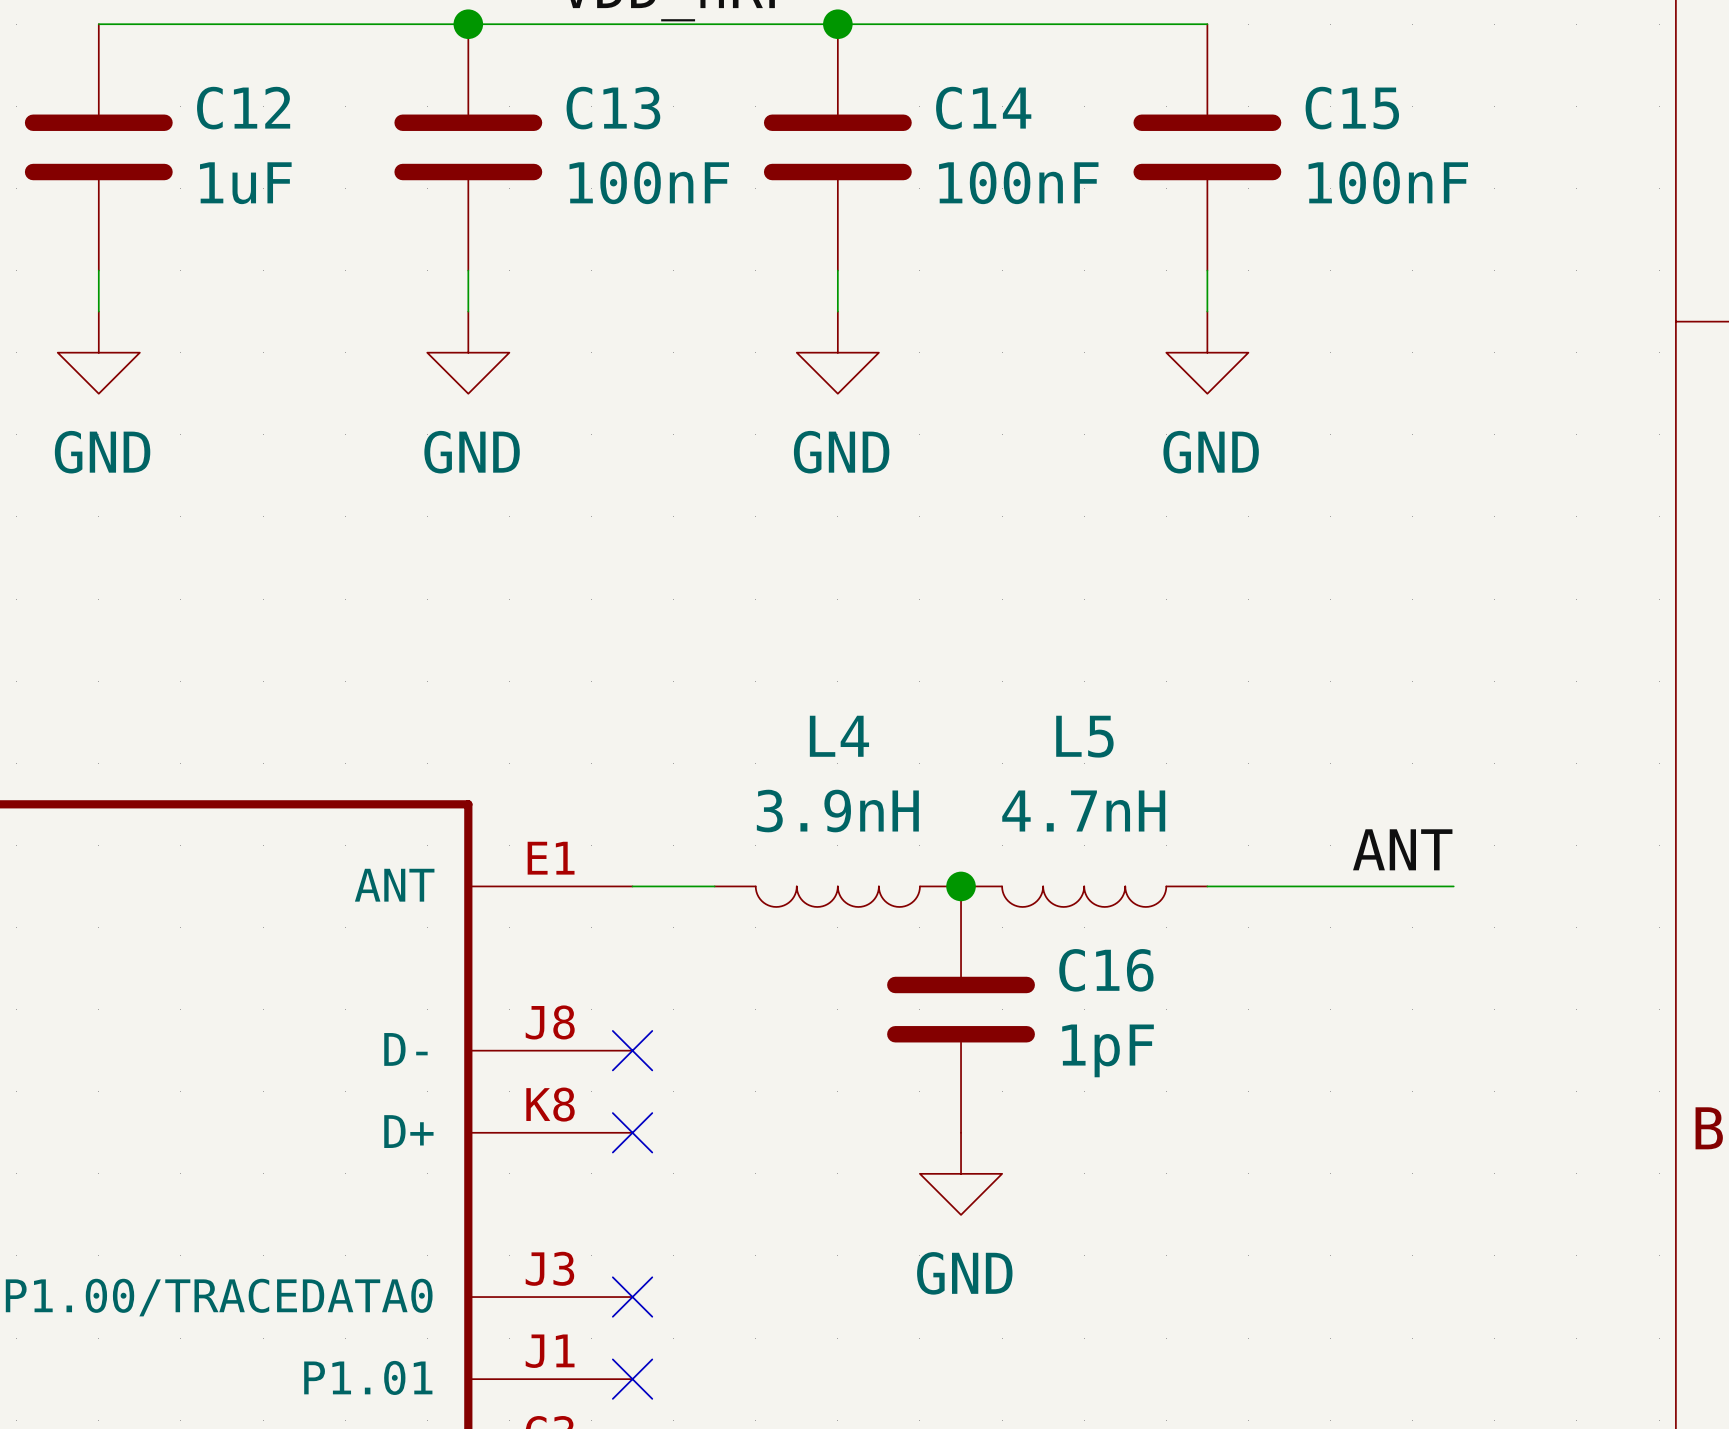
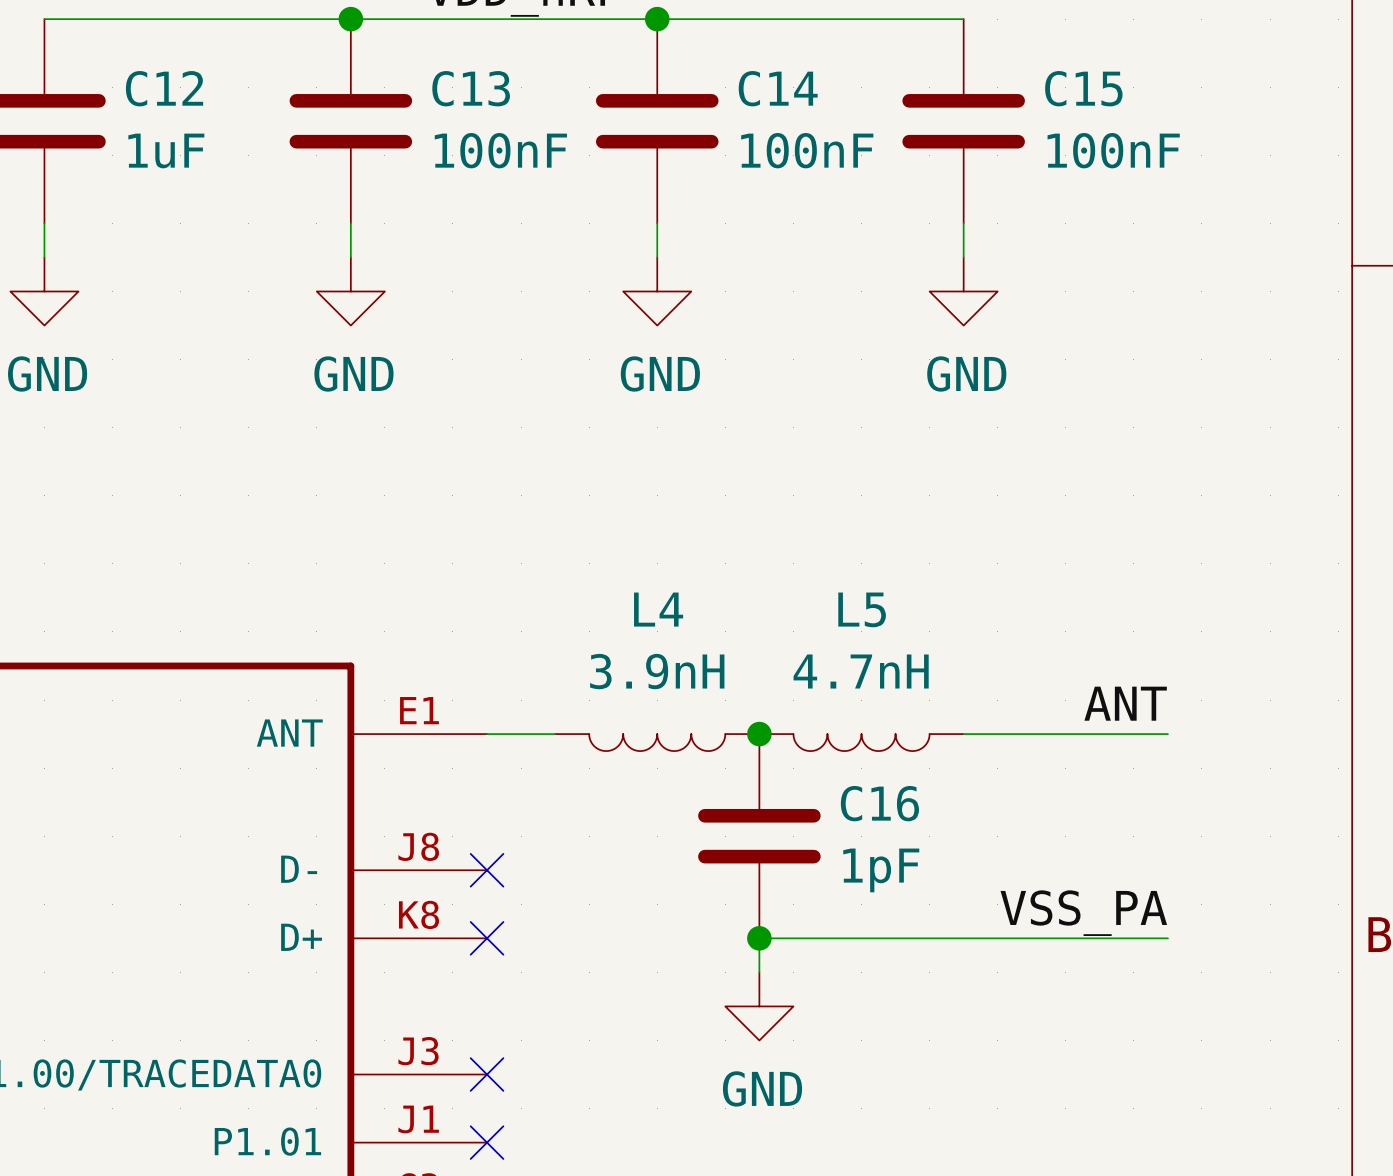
label: none -> VSS_PA (1083, 913)
junction: none -> (759, 938)
wire: none -> (1167, 938) (759, 938) (759, 972)
power symbol position: GND (961, 1173) -> GND (759, 1006)

